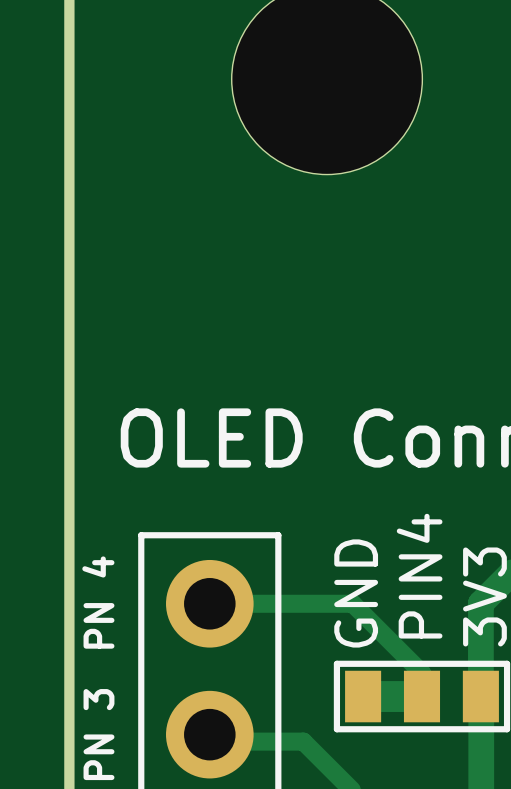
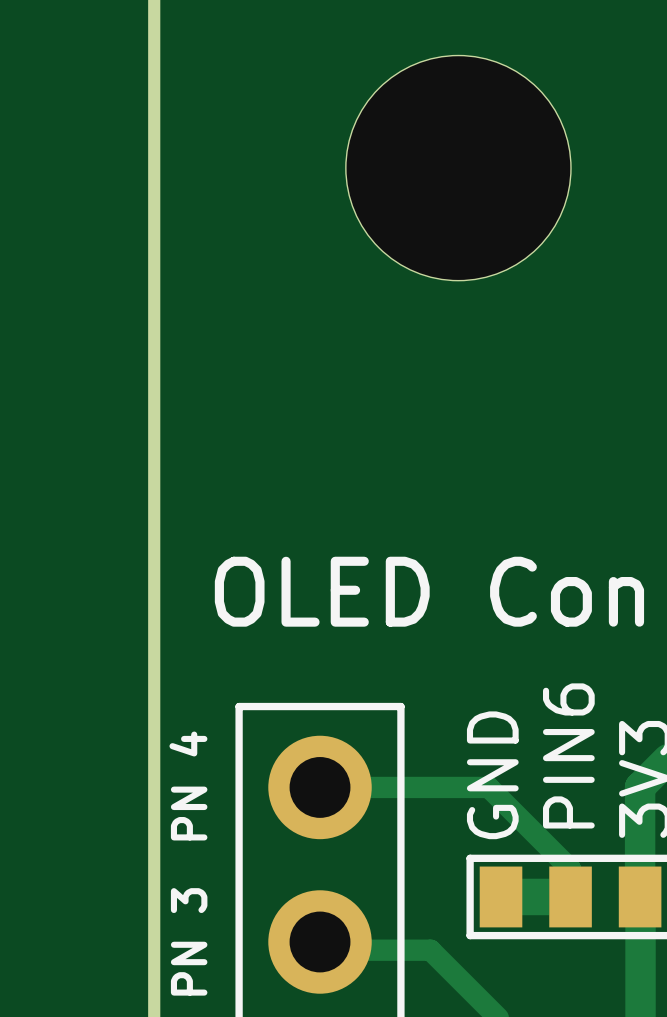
PIN4 name: PIN4 (419, 576) -> PIN6 (568, 755)

